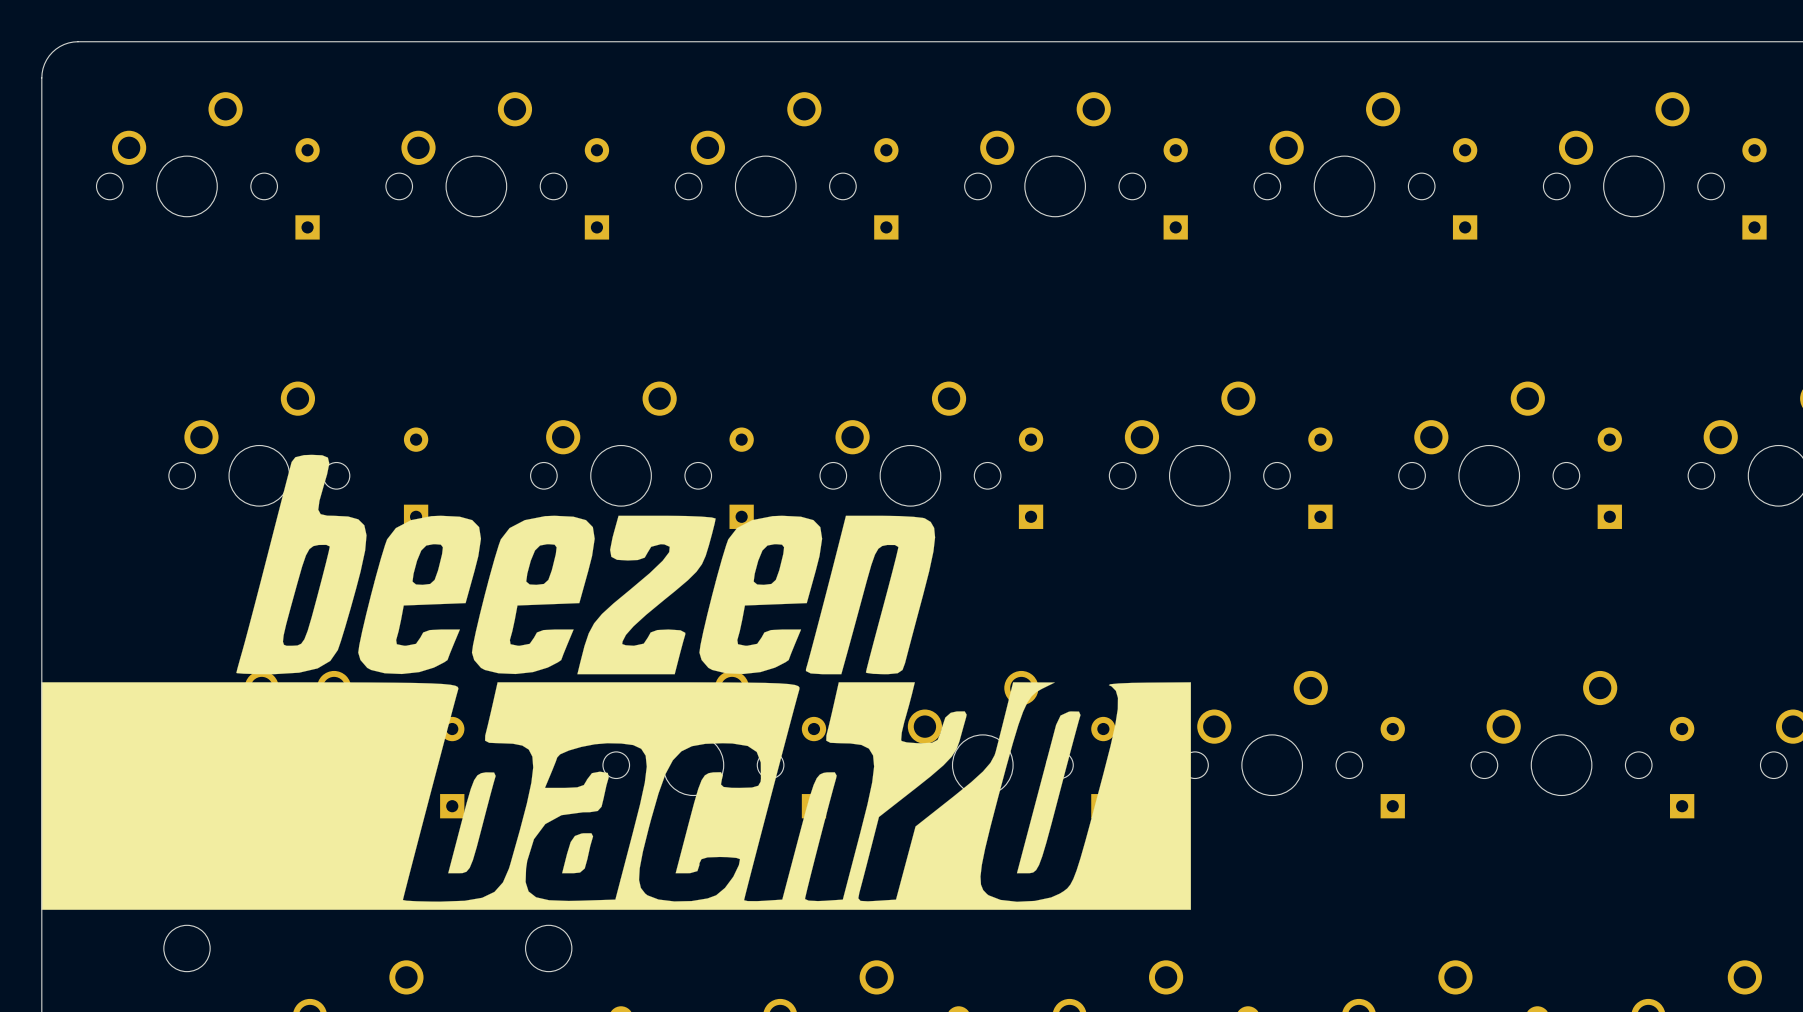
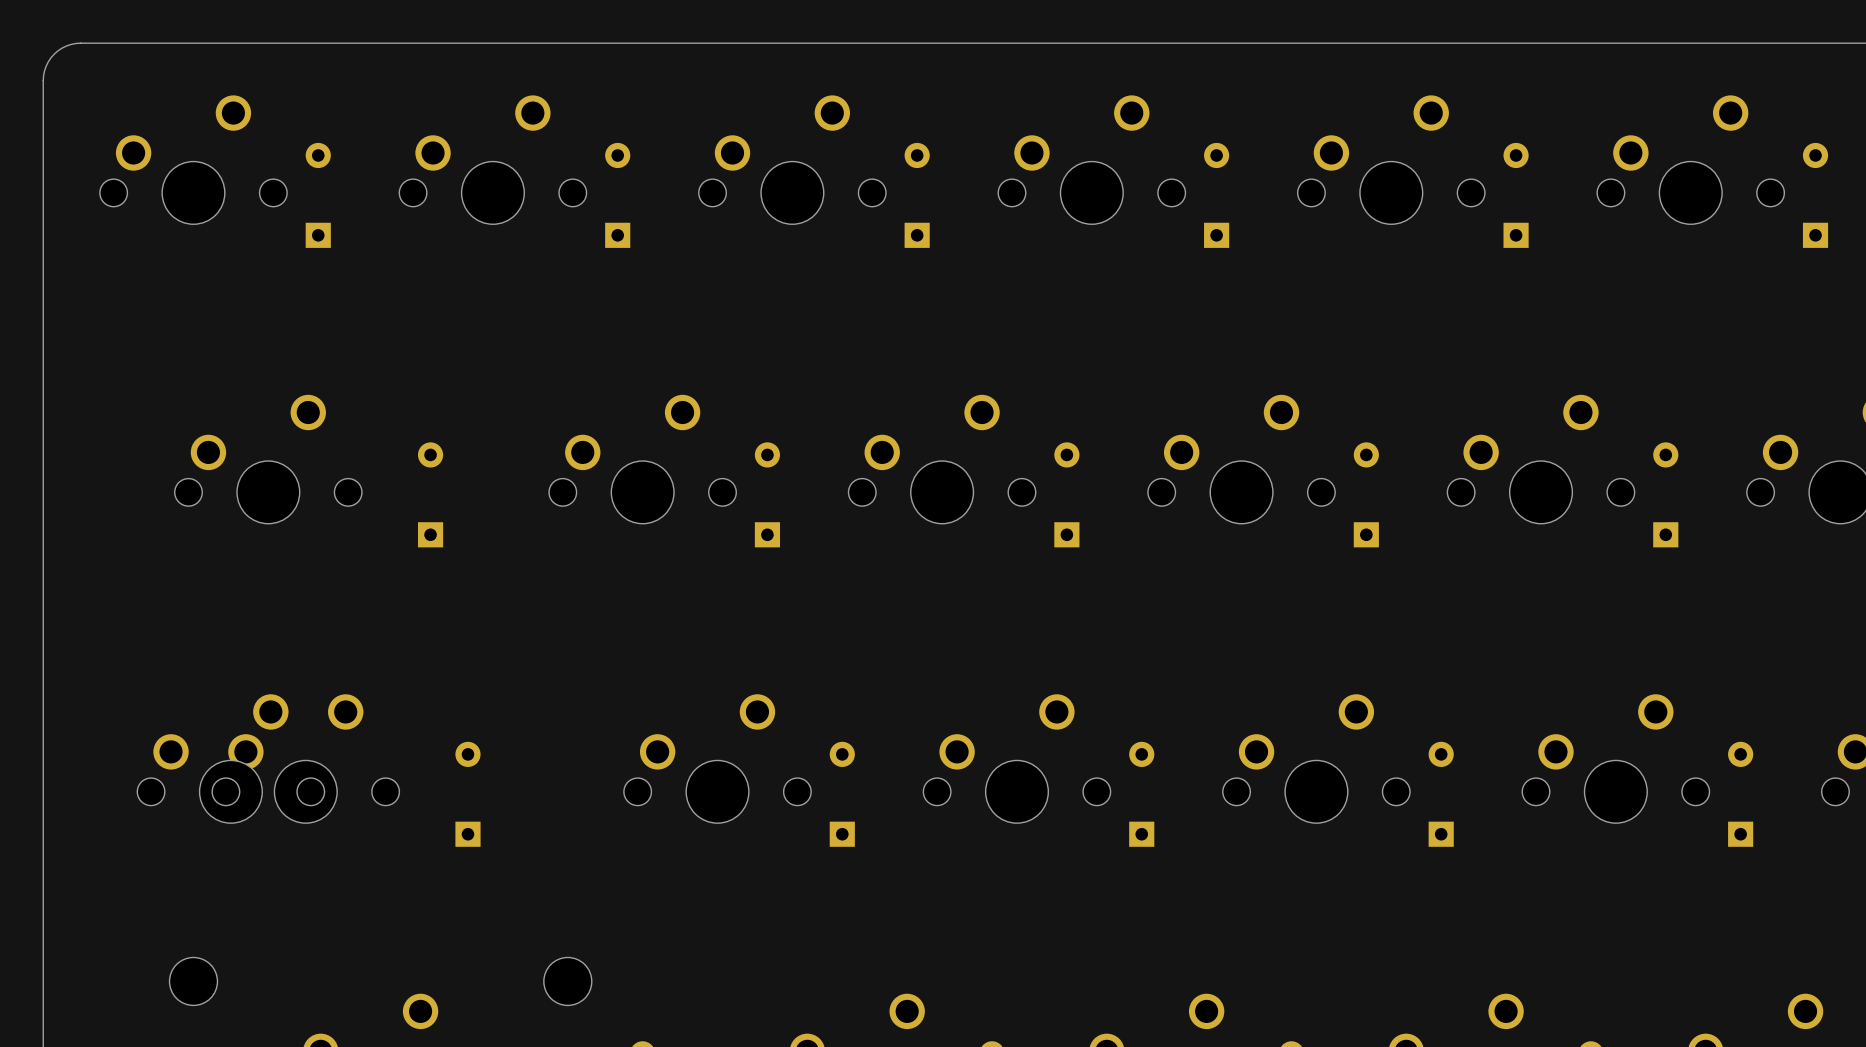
drawing: [41, 454, 1191, 910] -> none

